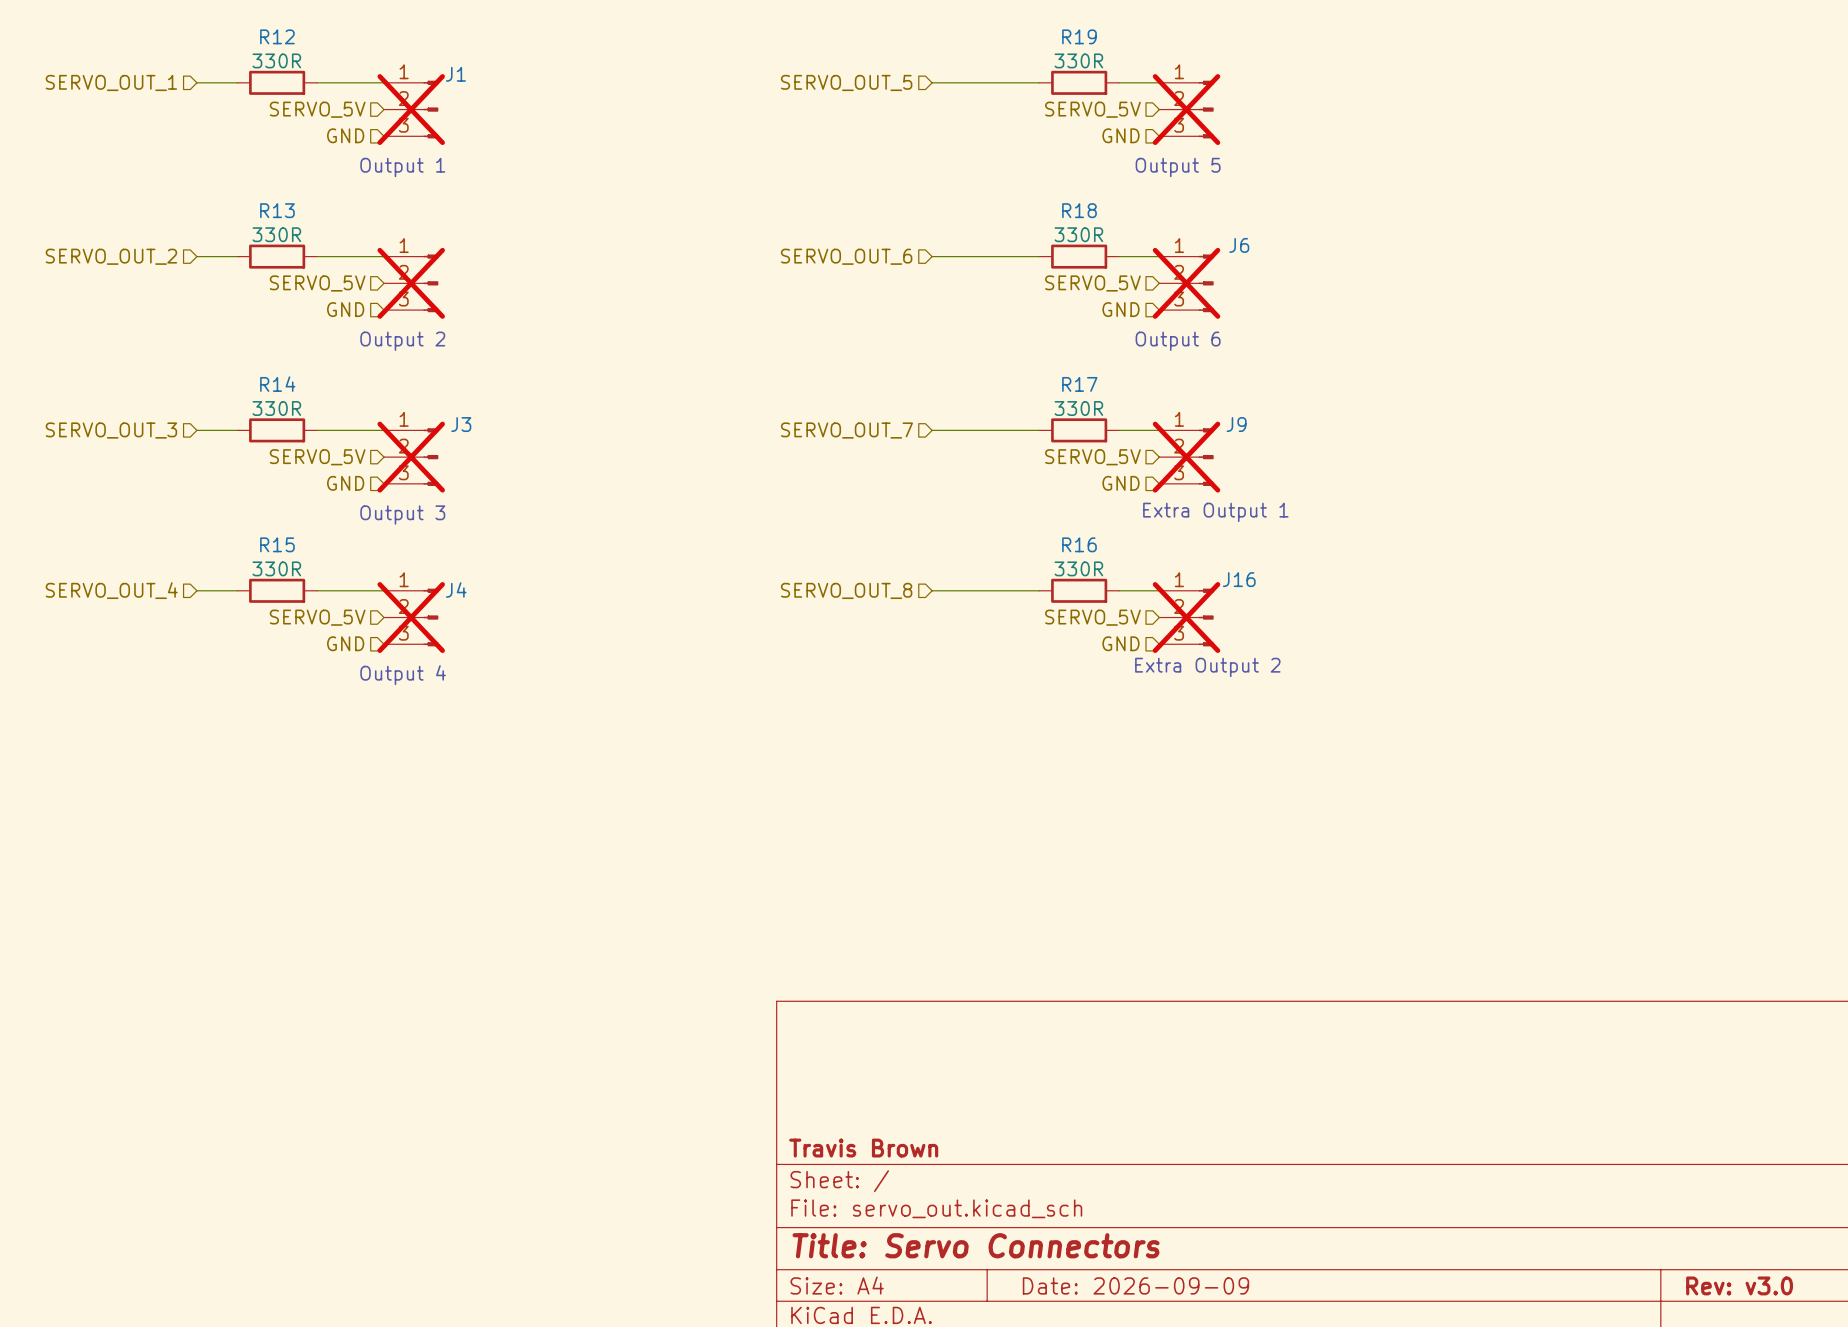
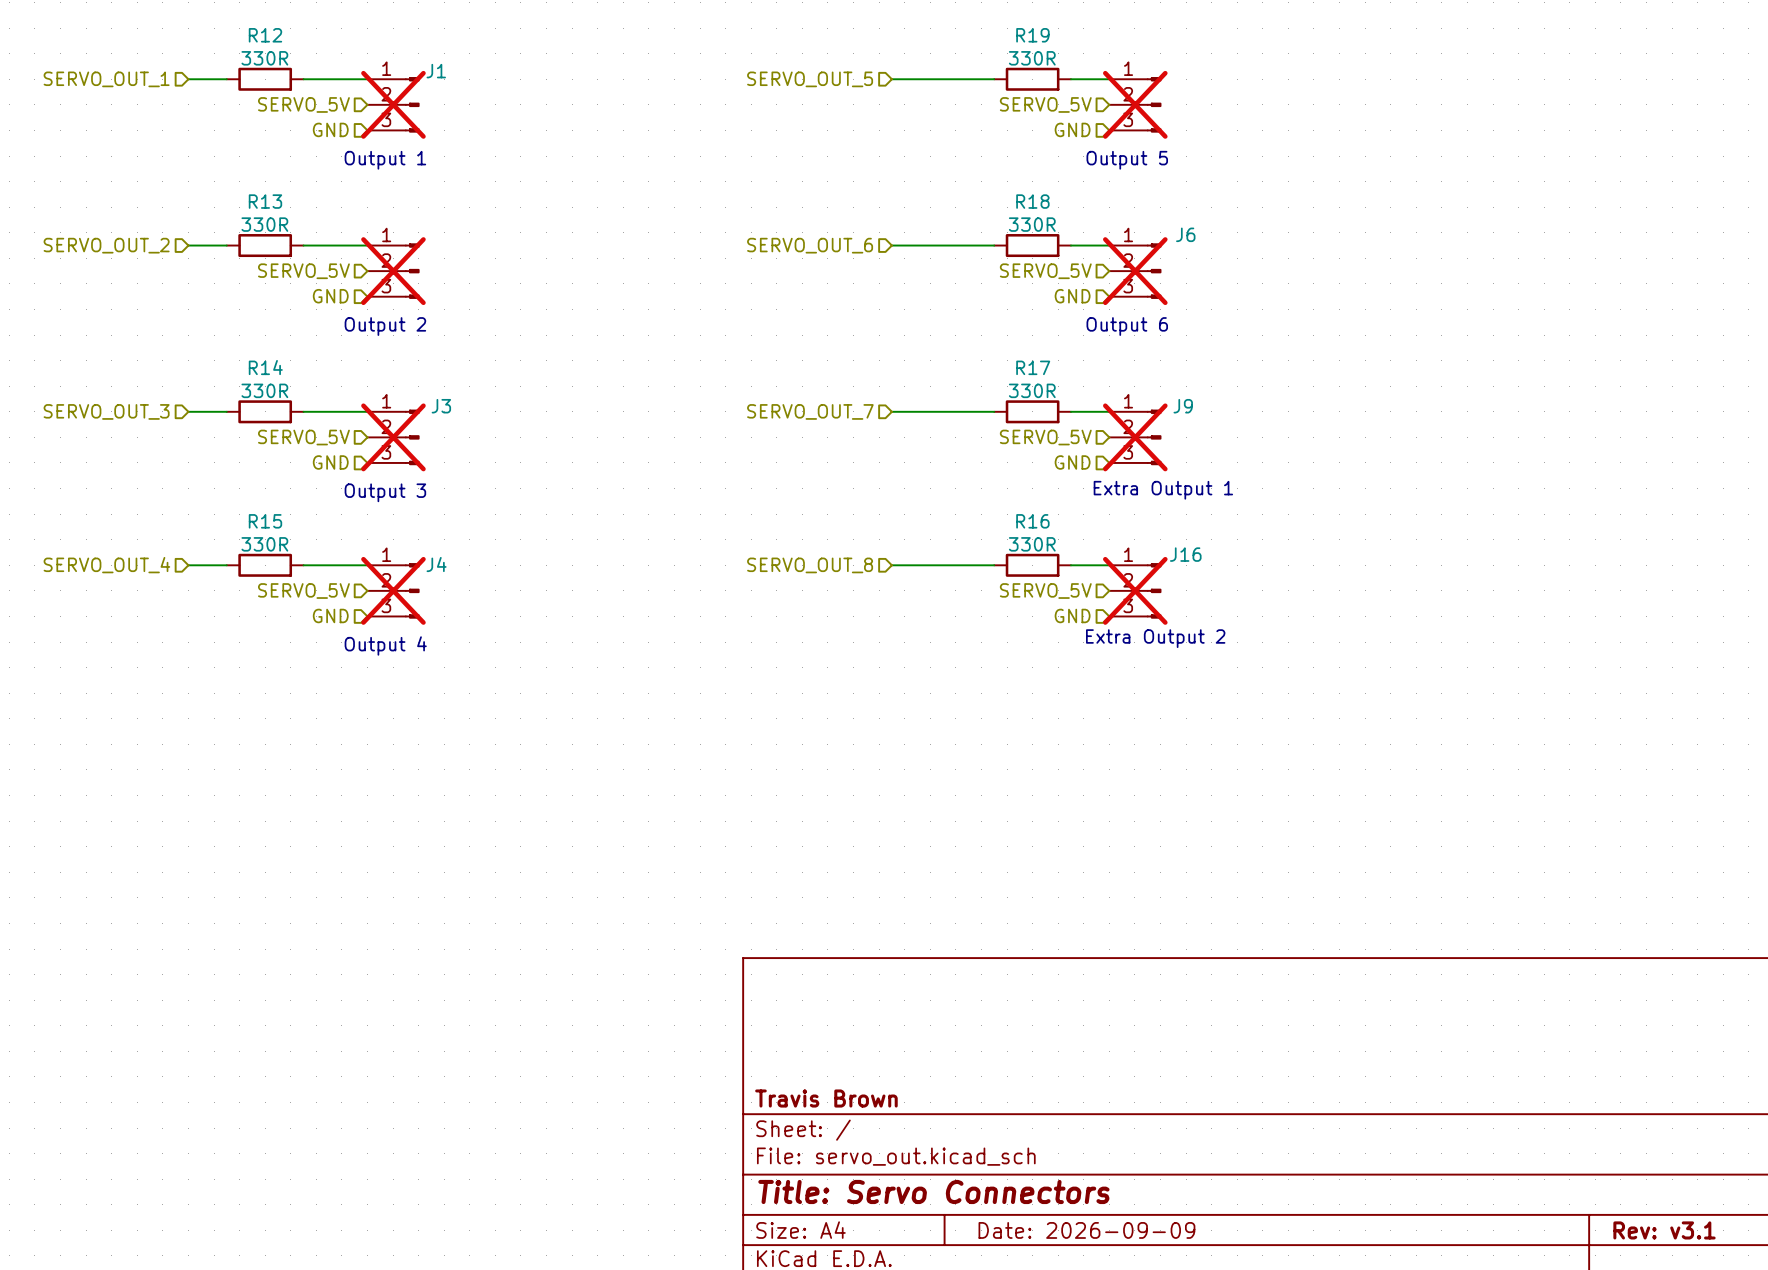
title block: Rev: v3.0 (1739, 1285) -> Rev: v3.1 (1664, 1230)

